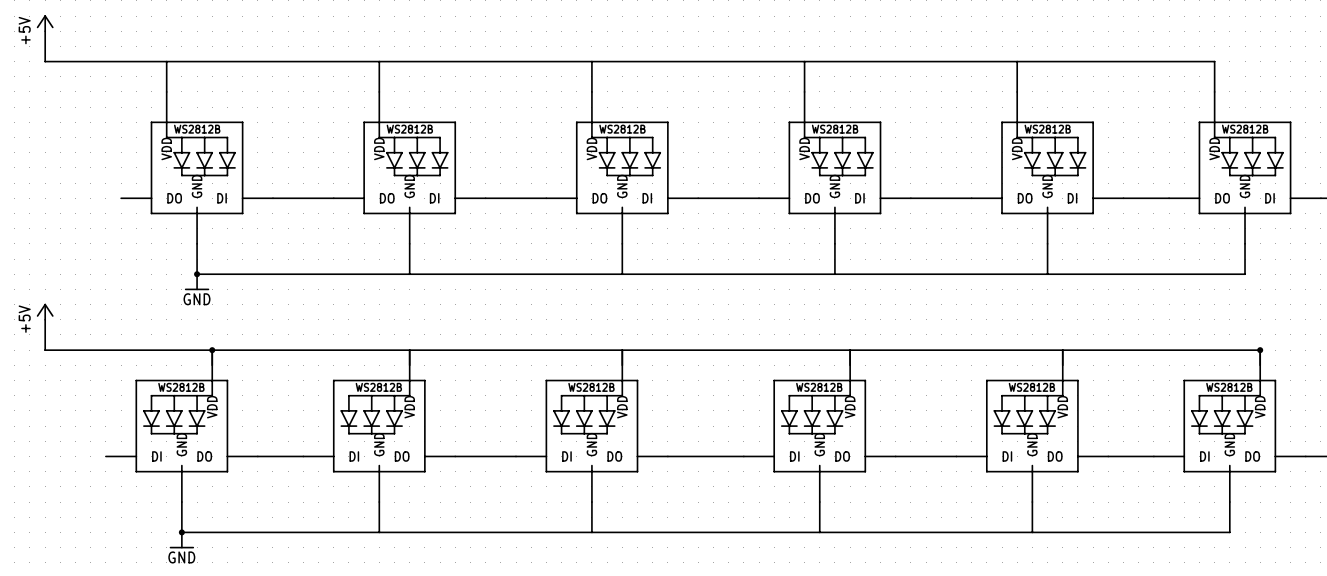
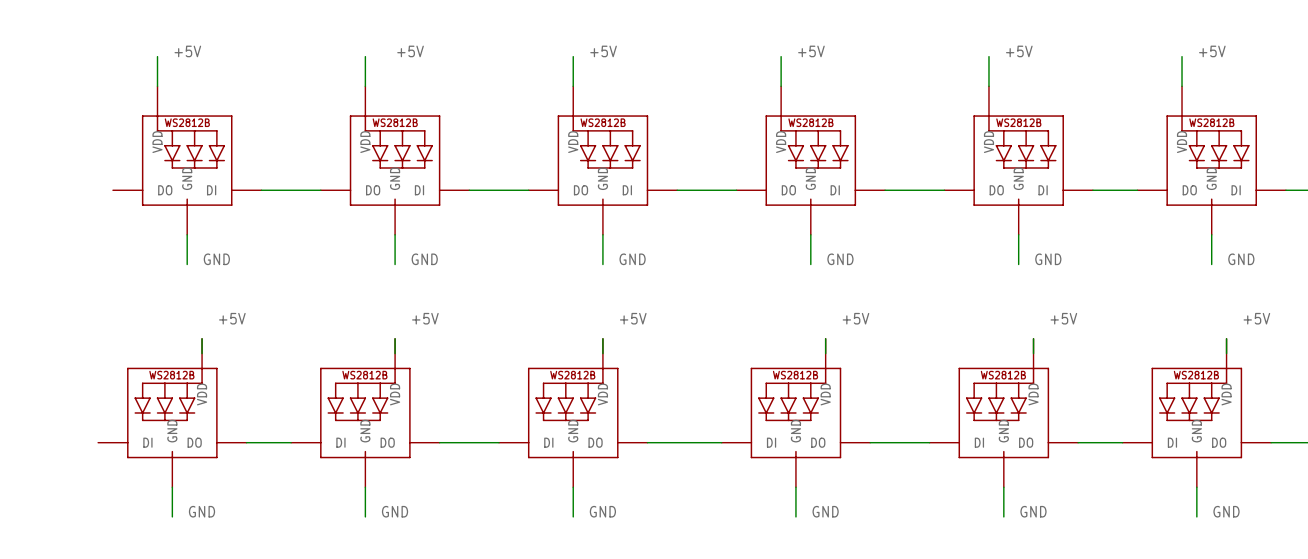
power symbol: +5V (45, 23) -> none
wire: (45, 31) (45, 61) (1214, 61) -> none
label: none -> +5V (187, 51)
label: none -> +5V (410, 51)
label: none -> +5V (603, 51)
label: none -> +5V (811, 51)
label: none -> +5V (1019, 51)
label: none -> +5V (1212, 51)
label: none -> GND (216, 259)
label: none -> GND (424, 259)
label: none -> GND (632, 259)
label: none -> GND (840, 259)
label: none -> GND (1048, 259)
label: none -> GND (1241, 259)
wire: (197, 274) (1245, 274) -> none
junction: (197, 274) -> none
power symbol: GND (197, 282) -> none
power symbol: +5V (45, 311) -> none
wire: (45, 319) (45, 350) (1260, 350) -> none
label: none -> +5V (232, 318)
label: none -> +5V (425, 318)
label: none -> +5V (633, 318)
label: none -> +5V (855, 318)
label: none -> +5V (1063, 318)
label: none -> +5V (1256, 318)
junction: (212, 350) -> none
junction: (1260, 350) -> none
label: none -> GND (201, 511)
label: none -> GND (395, 511)
label: none -> GND (602, 511)
label: none -> GND (825, 511)
label: none -> GND (1033, 511)
label: none -> GND (1226, 511)
wire: (181, 532) (1229, 532) -> none
junction: (181, 532) -> none
power symbol: GND (181, 540) -> none

